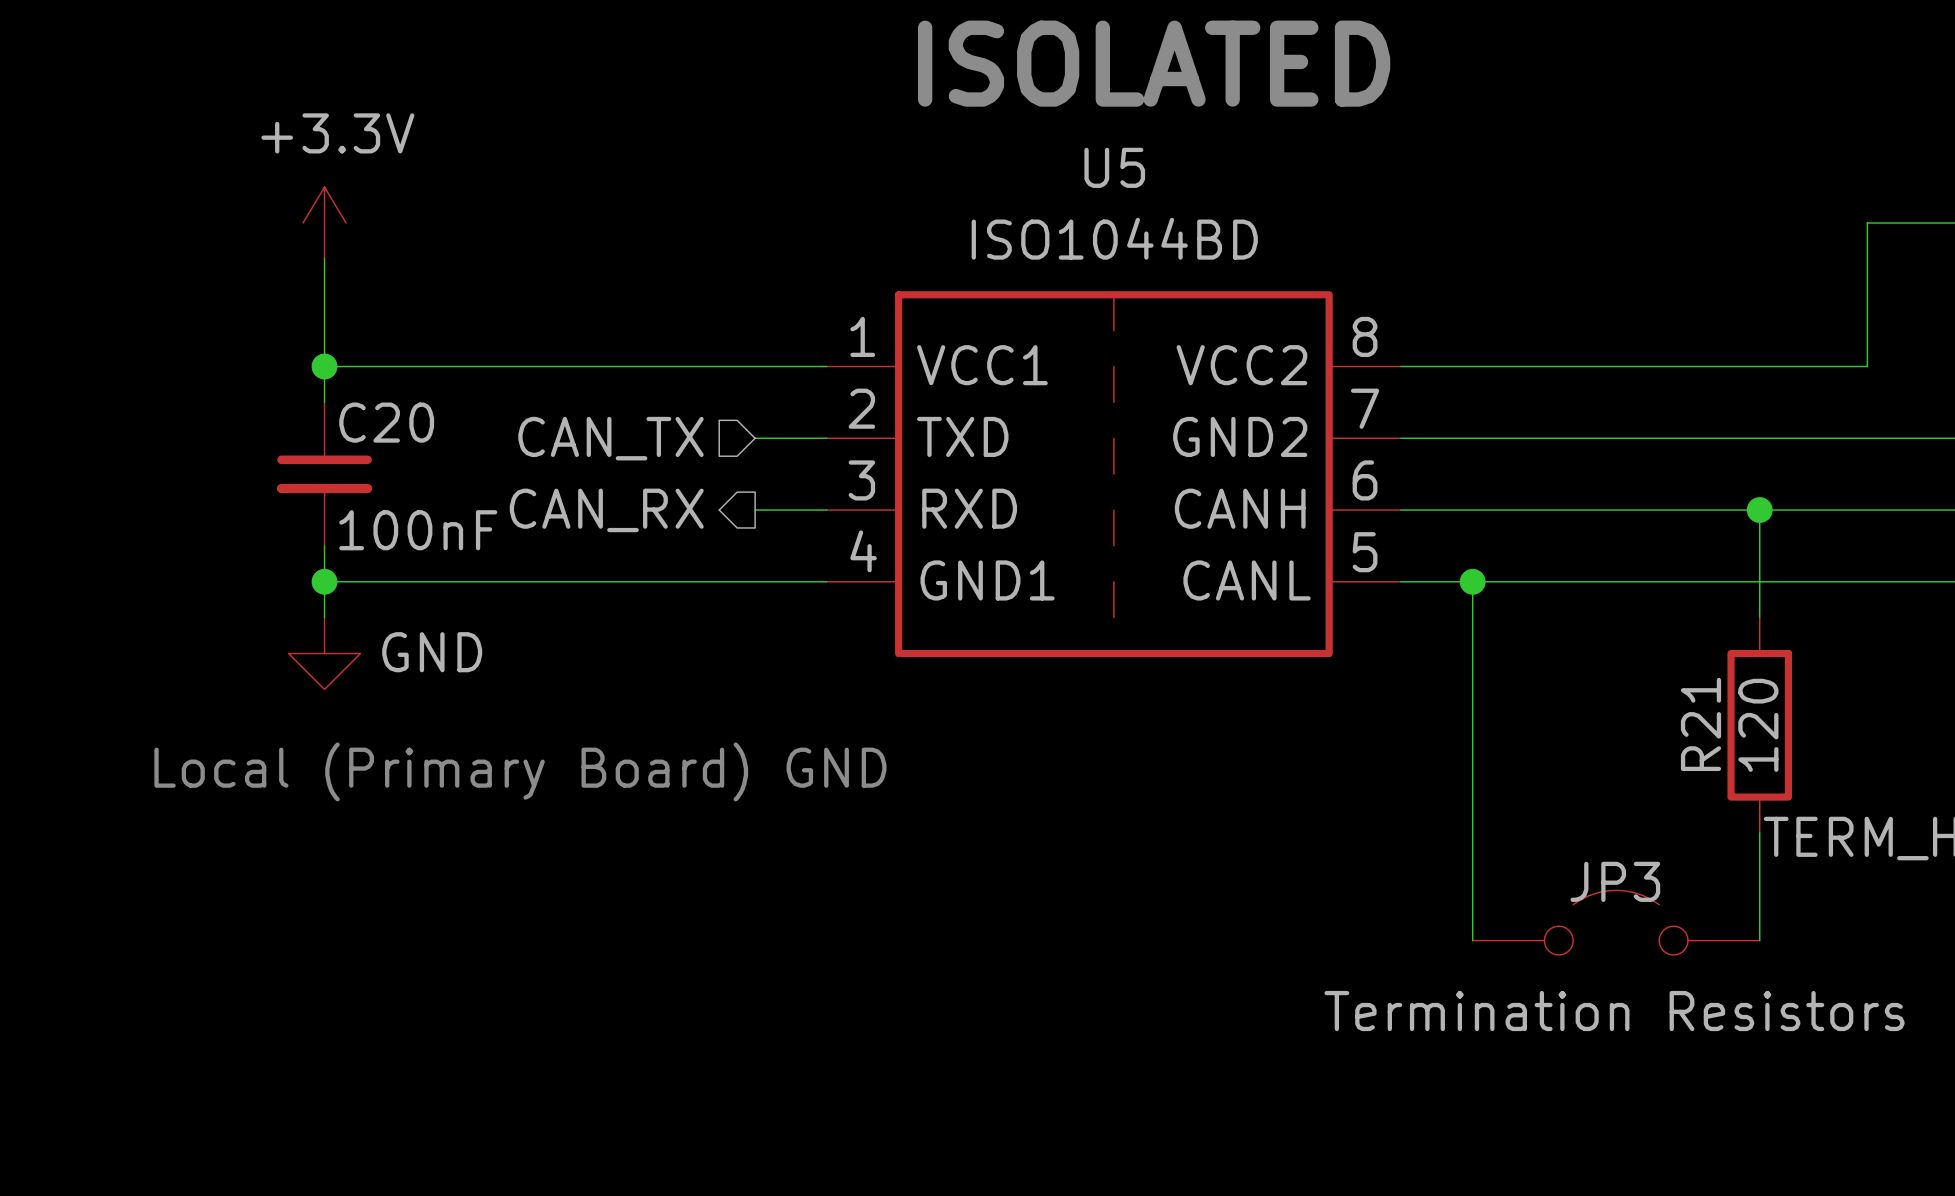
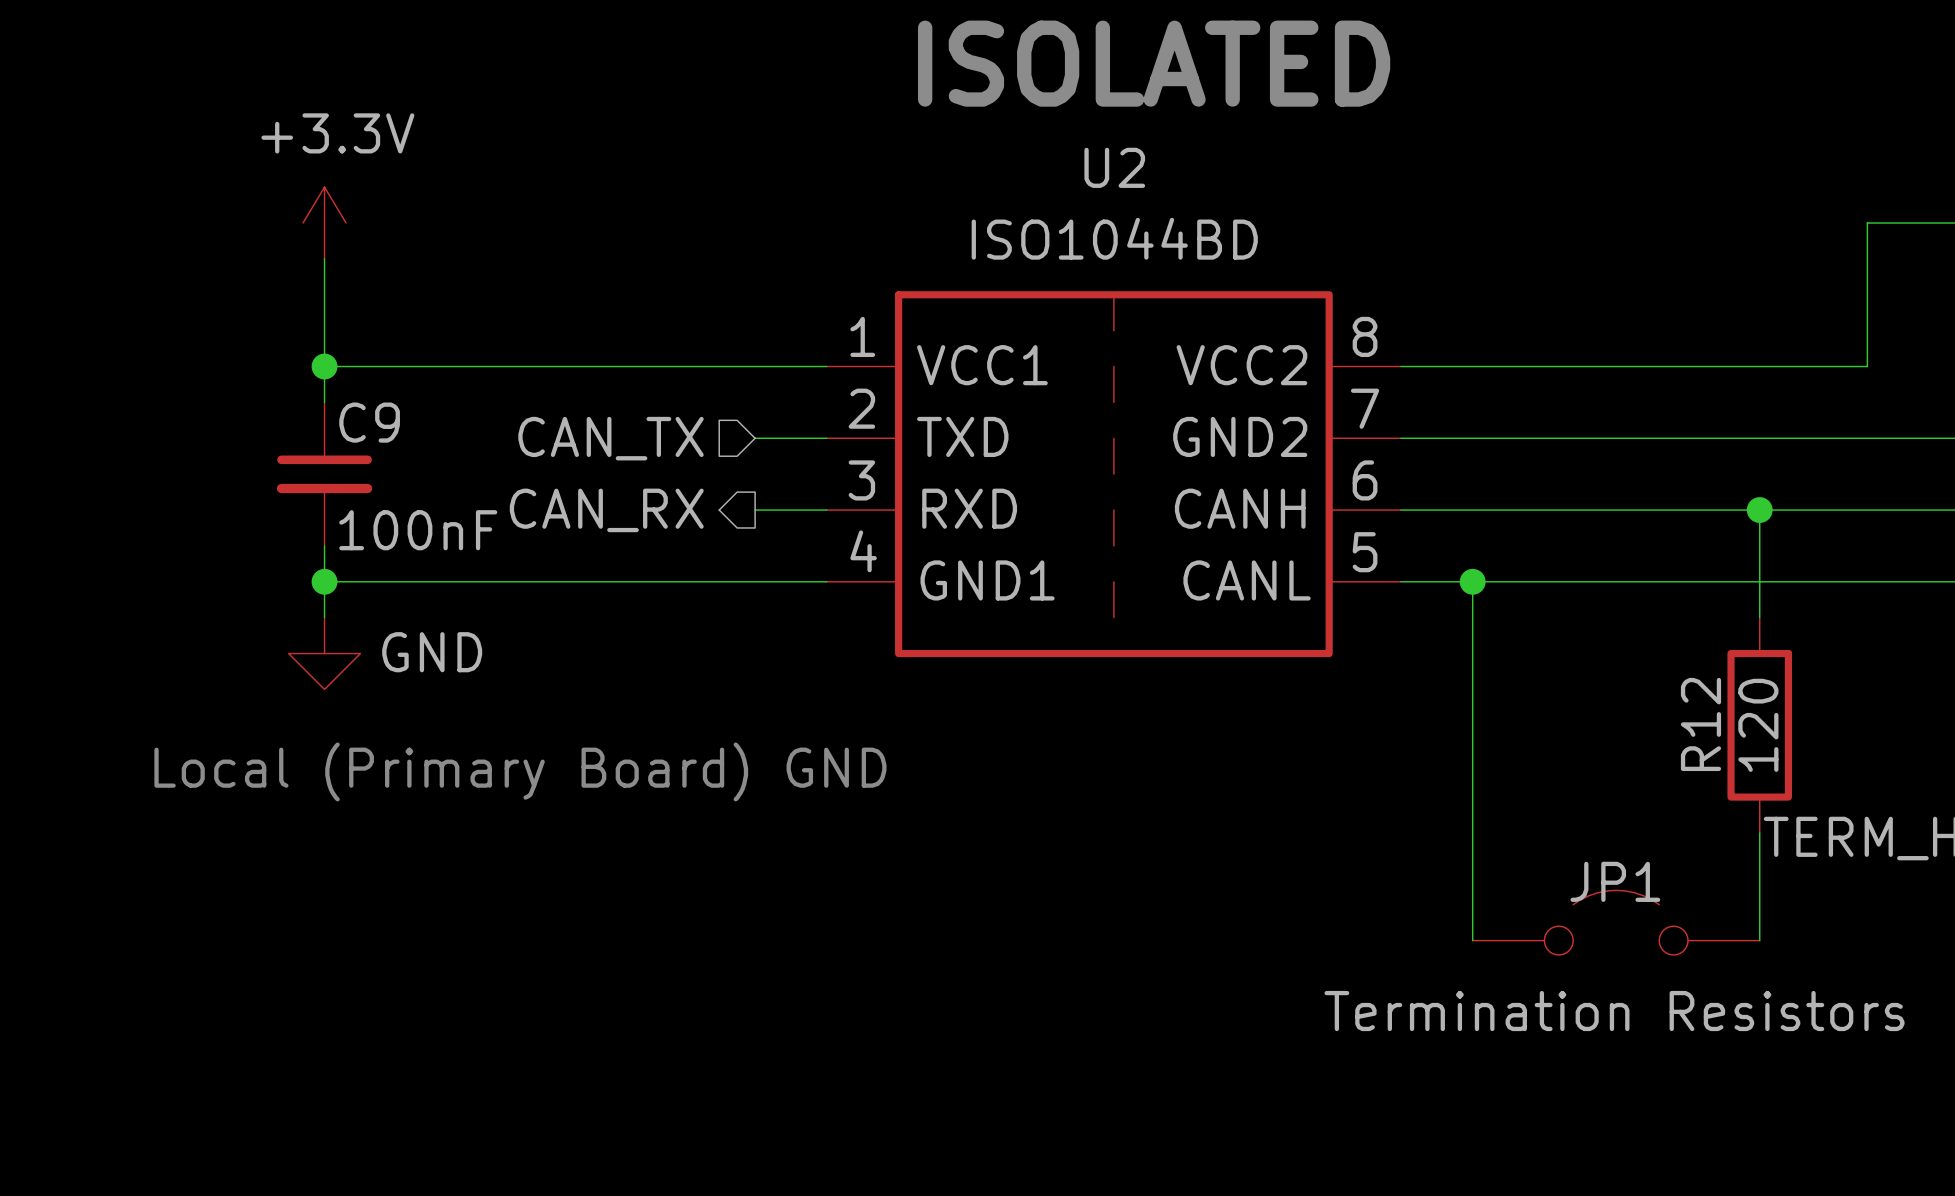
U5 name: U5 (1114, 167) -> U2 (1114, 167)
C20 name: C20 (386, 422) -> C9 (369, 422)
R21 name: R21 (1700, 724) -> R12 (1700, 724)
JP3 name: JP3 (1615, 881) -> JP1 (1615, 881)

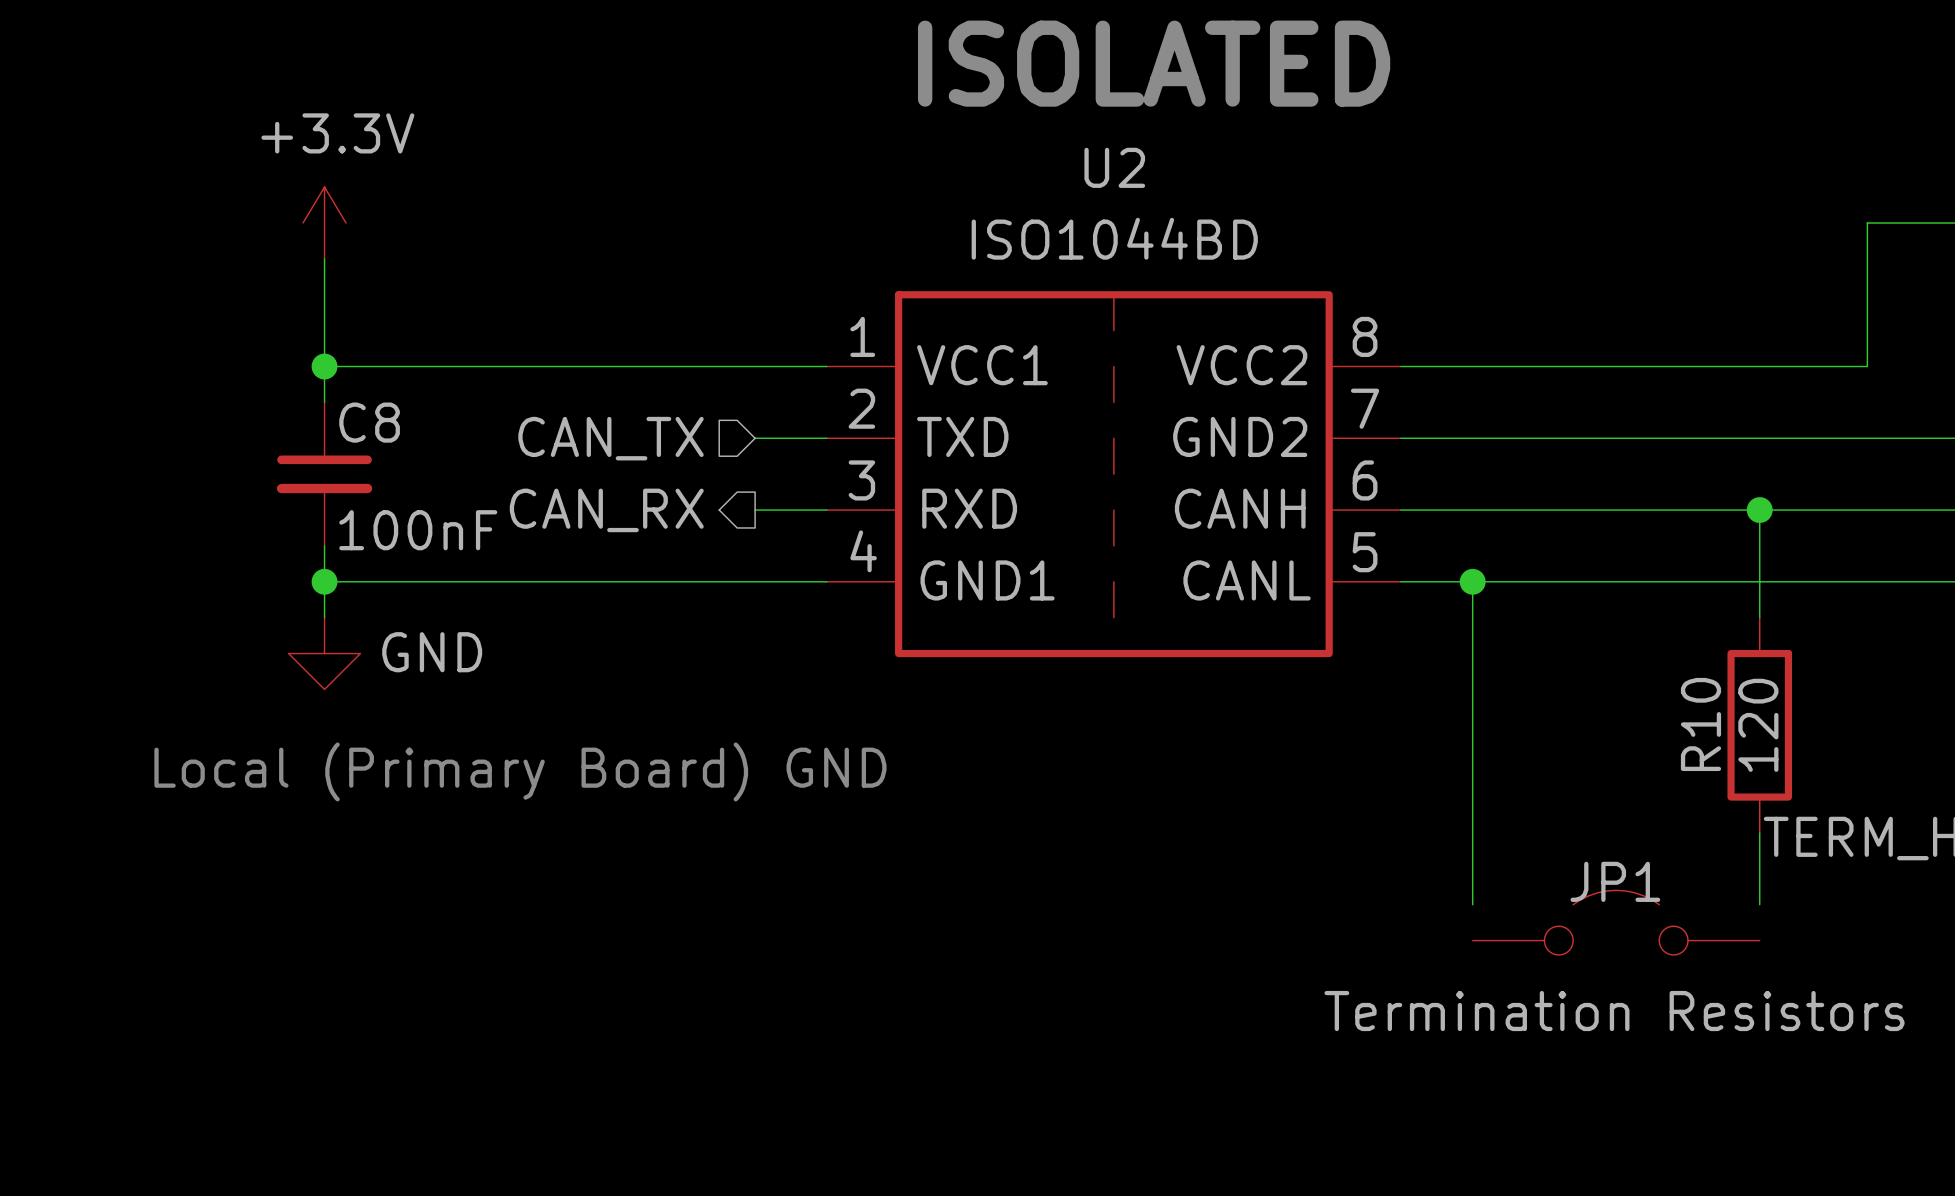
C9 name: C9 (369, 422) -> C8 (369, 422)
R12 name: R12 (1700, 724) -> R10 (1700, 724)
wire: (1472, 904) (1472, 940) -> none
wire: (1759, 904) (1759, 940) -> none

